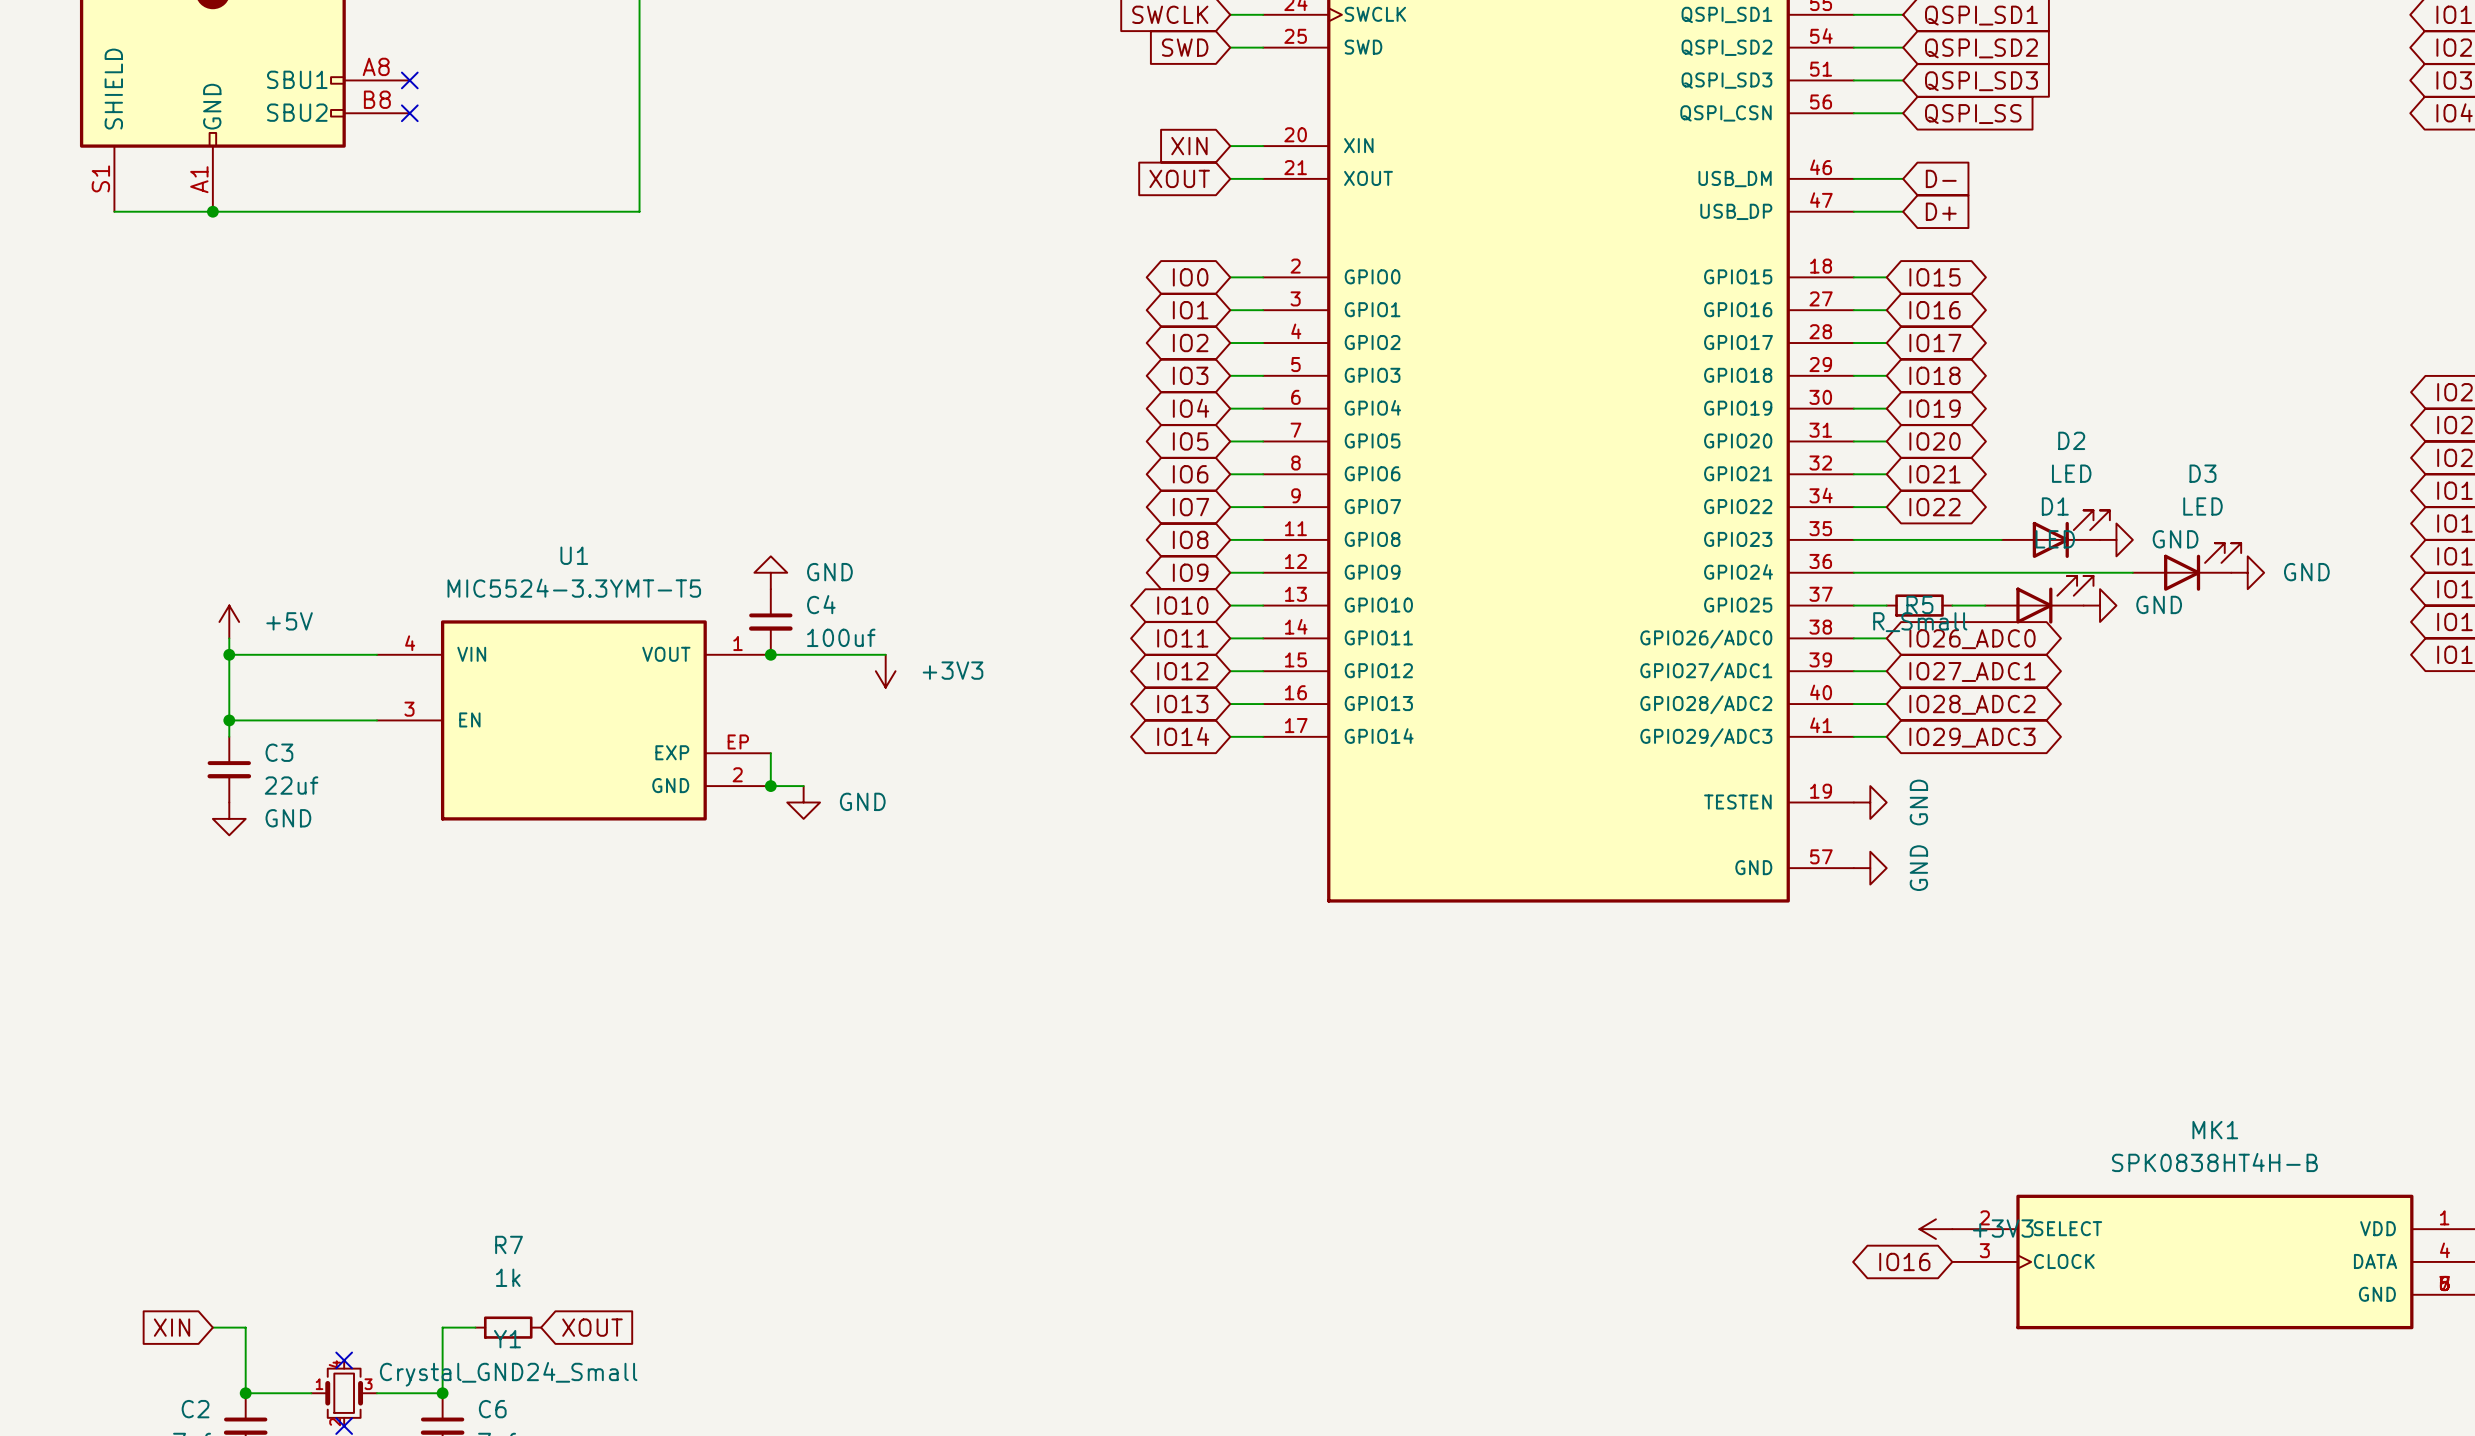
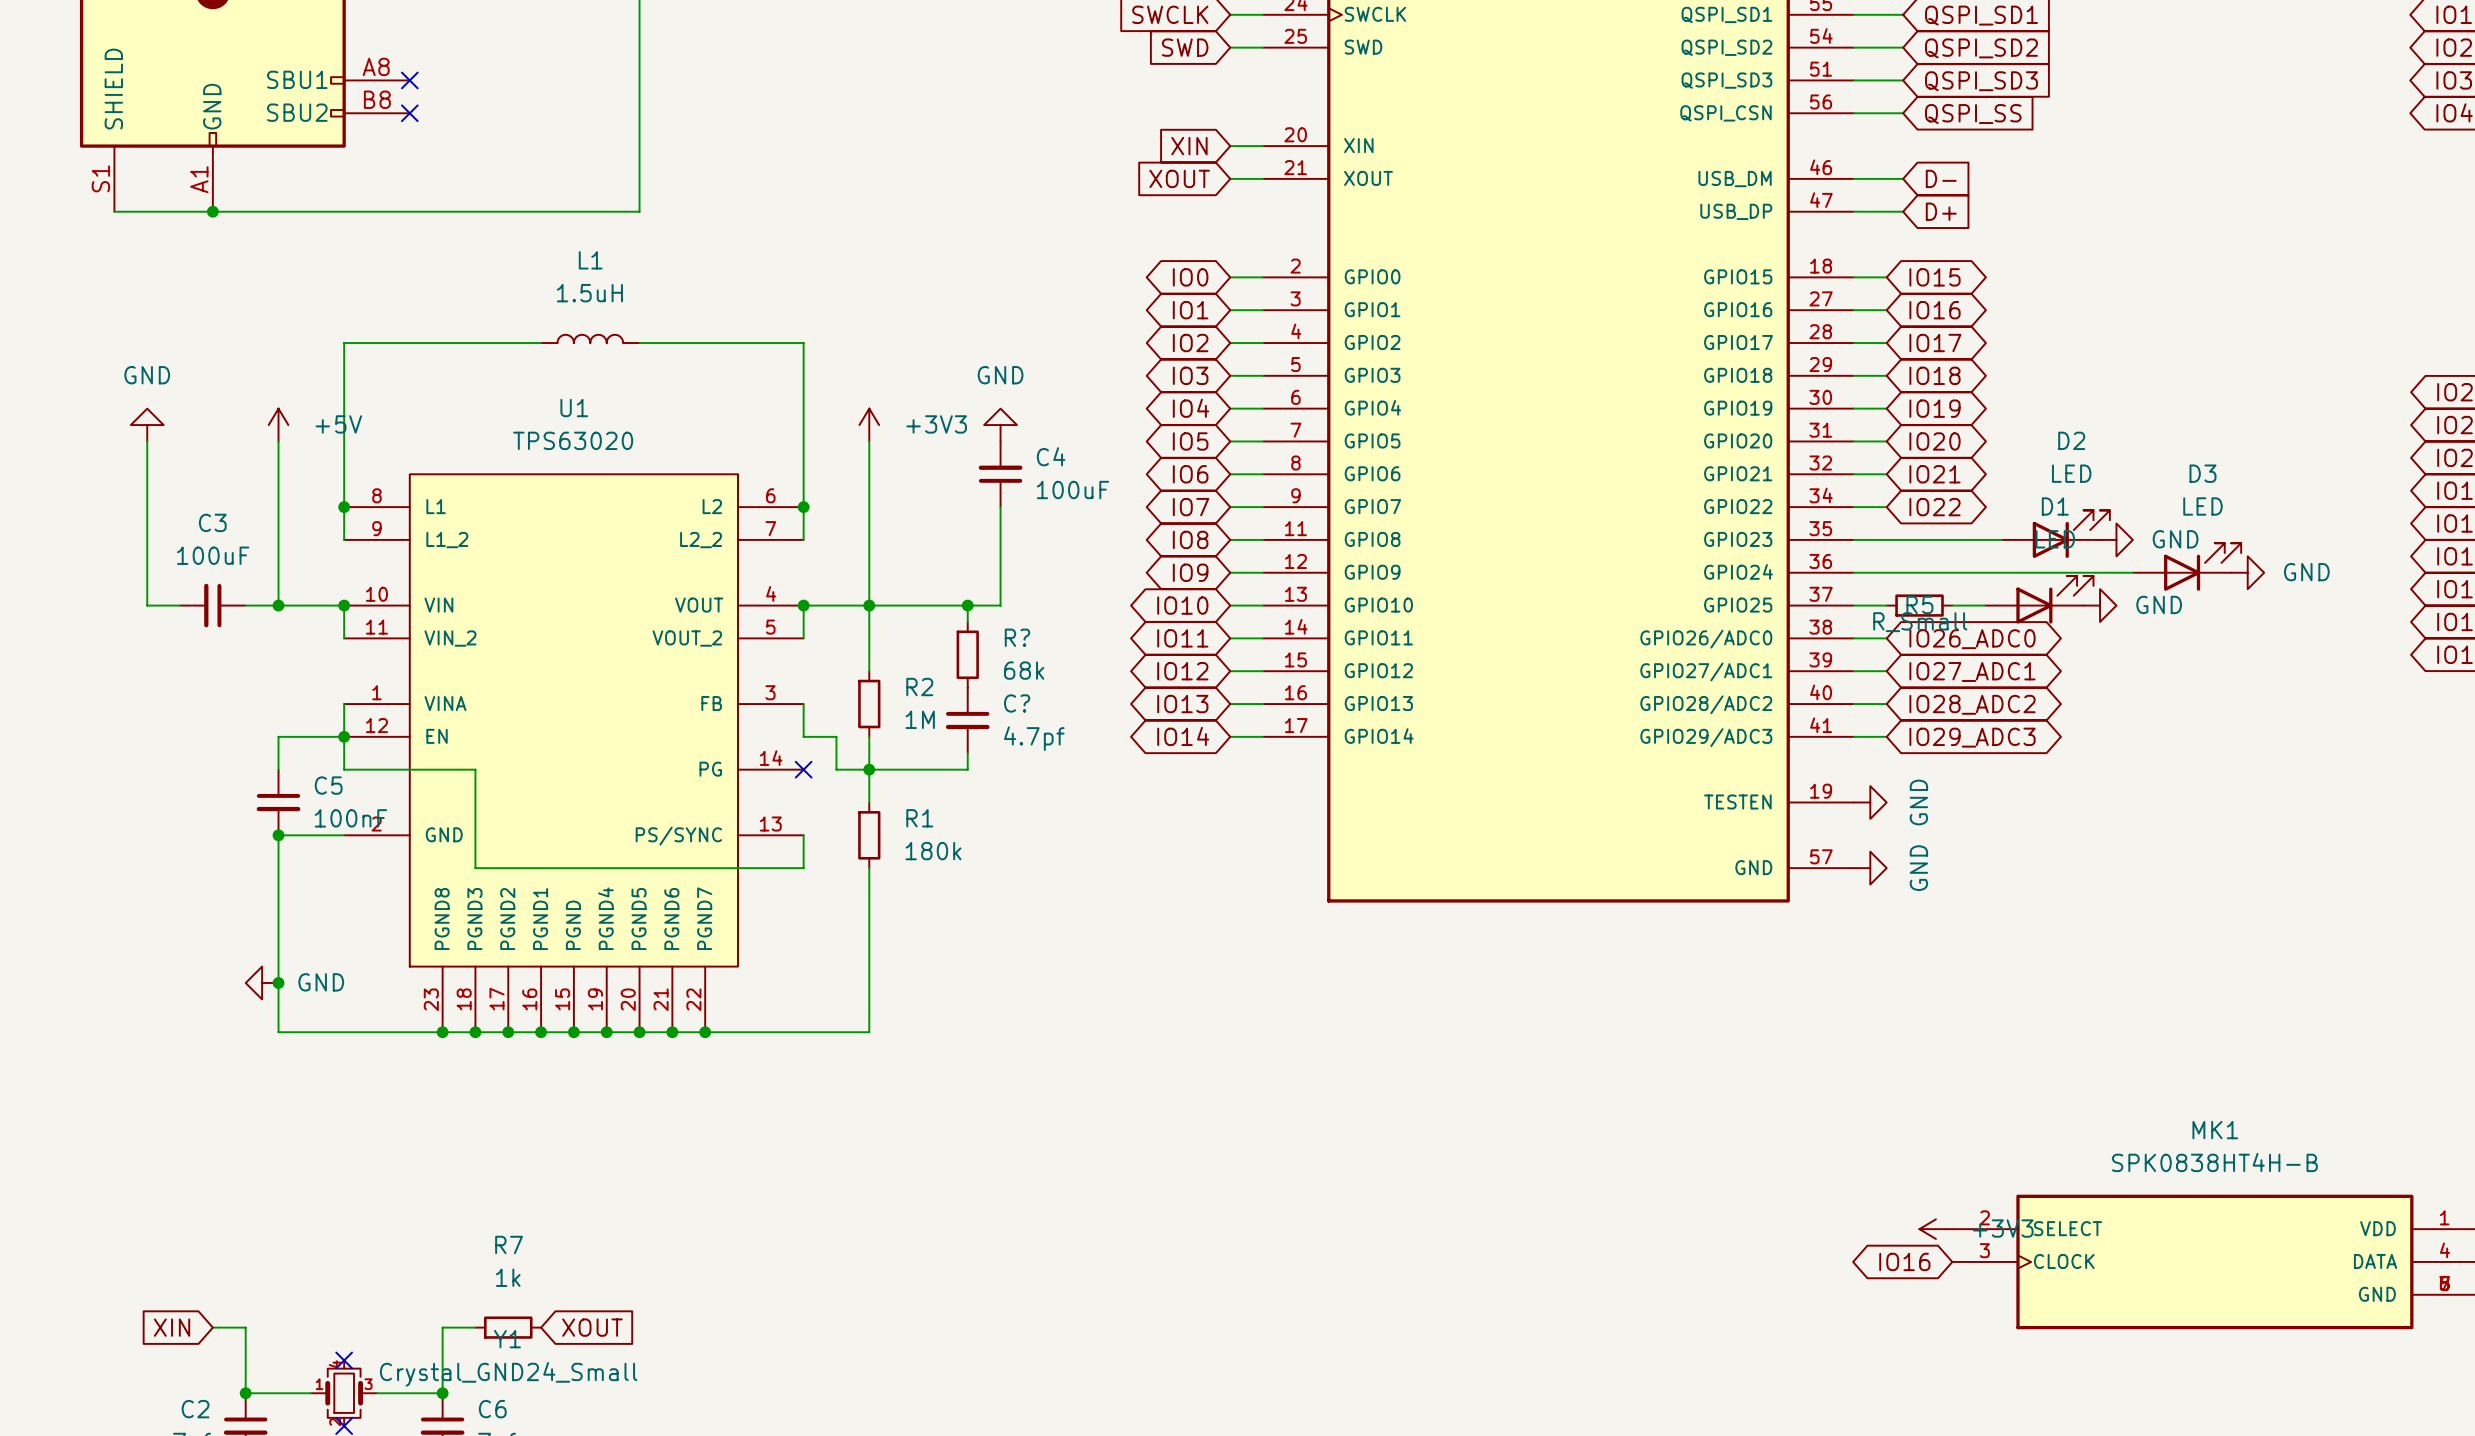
L1: none -> 1.5uH (590, 338)
wire: none -> (541, 343) (344, 343) (344, 539)
wire: none -> (639, 343) (803, 343) (803, 539)
power symbol: none -> GND (147, 425)
power symbol: none -> GND (1000, 425)
wire: none -> (147, 441) (147, 605) (180, 605)
wire: none -> (278, 441) (278, 605)
wire: none -> (869, 441) (869, 671)
junction: none -> (344, 507)
junction: none -> (803, 507)
wire: none -> (1000, 507) (1000, 605) (803, 605) (803, 638)
U1 name position: U1 (574, 555) -> U1 (574, 408)
power symbol: GND (770, 572) -> none
U1 value: MIC5524-3.3YMT-T5 (574, 588) -> TPS63020 (573, 440)
wire: none -> (245, 605) (344, 605) (344, 638)
junction: none -> (278, 605)
junction: none -> (344, 605)
junction: none -> (803, 605)
junction: none -> (869, 605)
wire: none -> (967, 605) (967, 621)
junction: none -> (967, 605)
U1 symbol: [376, 620, 771, 821] -> [344, 473, 804, 1033]
power symbol position: +5V (229, 621) -> +5V (278, 425)
C4 position: (770, 621) -> (1000, 474)
C4 rotation: 0° (770, 622) -> 180° (1000, 474)
C4 value: 100uf (841, 637) -> 100uF (1072, 490)
wire: (229, 638) (229, 736) -> none
wire: (229, 654) (376, 654) -> none
junction: (229, 654) -> none
wire: (770, 654) (885, 654) -> none
junction: (770, 654) -> none
R?: none -> 68k (967, 654)
power symbol rotation: 0° (885, 671) -> 180° (869, 425)
power symbol position: +3V3 (885, 671) -> +3V3 (869, 425)
wire: none -> (344, 704) (344, 769) (475, 769) (475, 868) (803, 868) (803, 835)
wire: none -> (803, 704) (803, 736) (836, 736) (836, 769) (967, 769) (967, 753)
R2: none -> 1M (869, 704)
wire: (229, 720) (376, 720) -> none
junction: (229, 720) -> none
C?: none -> 4.7pf (967, 720)
wire: none -> (344, 736) (278, 736) (278, 769)
junction: none -> (344, 736)
wire: none -> (869, 736) (869, 802)
C3 name position: C3 (279, 752) -> C3 (212, 522)
wire: (770, 753) (770, 786) (803, 786) -> none
C3 rotation: 0° (229, 769) -> 90° clockwise (212, 605)
C3 position: (229, 769) -> (212, 605)
no-connect mark: none -> (803, 769)
junction: none -> (869, 769)
C3 value: 22uf (291, 785) -> 100uF (213, 555)
junction: (770, 786) -> none
C5: none -> 100nF (278, 802)
power symbol: GND (803, 802) -> none
power symbol rotation: 0° (229, 818) -> 90° clockwise (262, 983)
power symbol position: GND (229, 818) -> GND (262, 983)
junction: none -> (278, 835)
wire: none -> (344, 835) (278, 835) (278, 1032) (869, 1032) (869, 868)
R1: none -> 180k (869, 835)
junction: none -> (278, 983)
junction: none -> (442, 1032)
junction: none -> (475, 1032)
junction: none -> (508, 1032)
junction: none -> (541, 1032)
junction: none -> (573, 1032)
junction: none -> (606, 1032)
junction: none -> (639, 1032)
junction: none -> (672, 1032)
junction: none -> (705, 1032)

